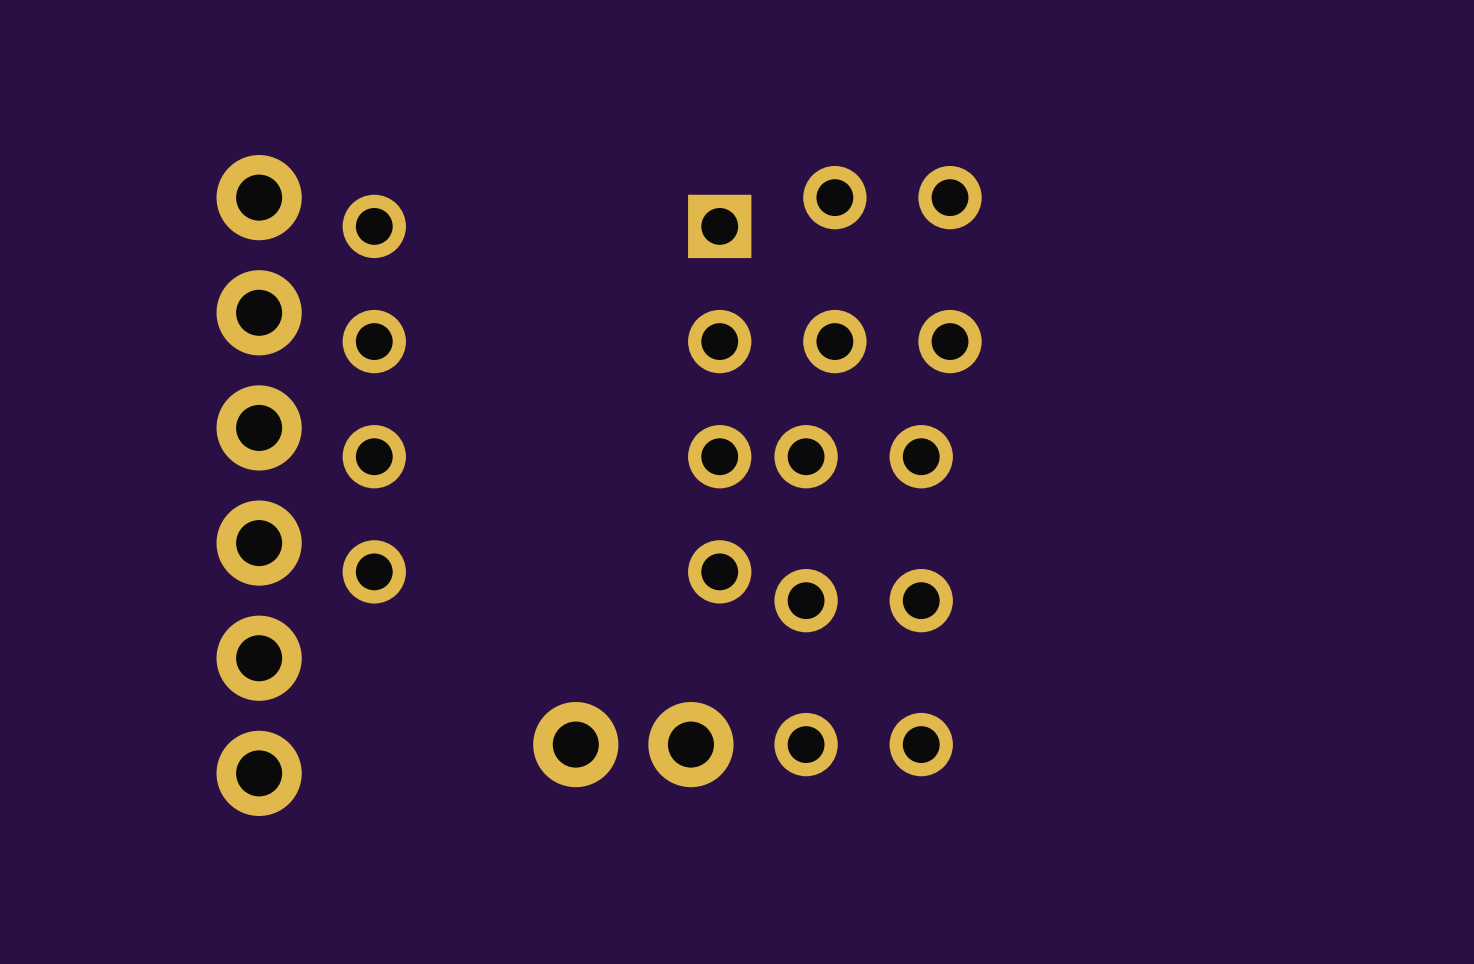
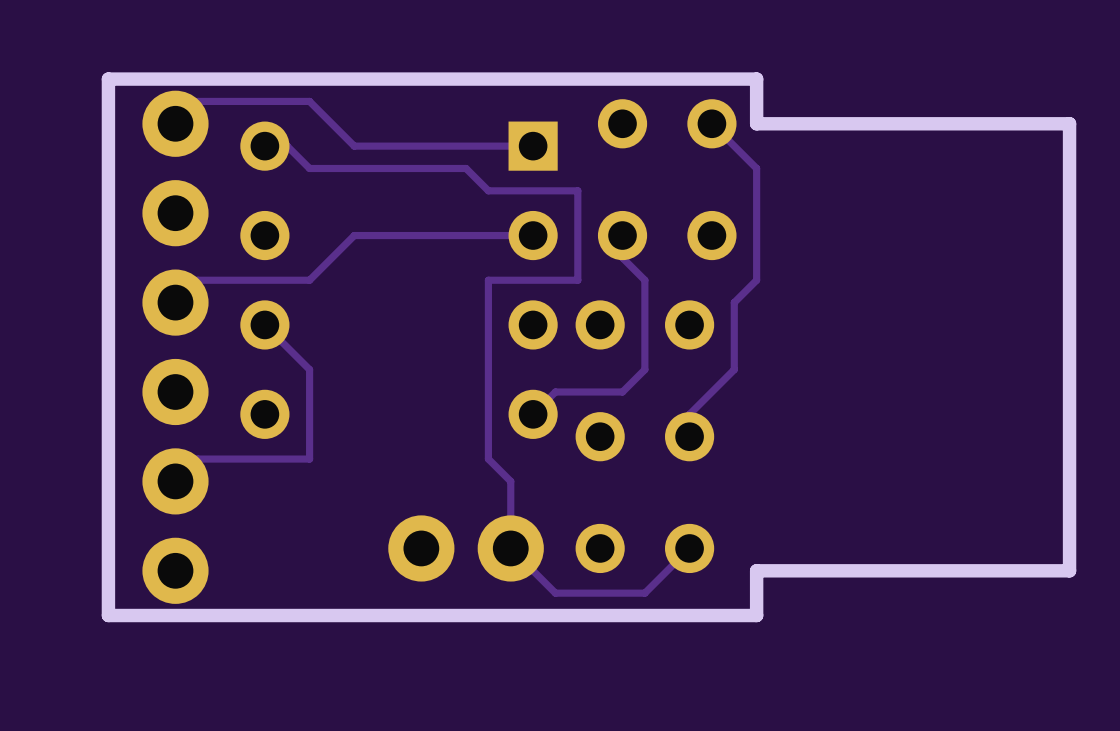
board edge: none -> (756, 79) (756, 123) (1069, 123) (1069, 570) (756, 570) (756, 615) (108, 615) (108, 79) (756, 79)
track: none -> (175, 123) (197, 101) (309, 101) (354, 146) (533, 146)
track: none -> (711, 123) (756, 168) (756, 280) (734, 302) (734, 369) (689, 414) (689, 436)
track: none -> (264, 146) (287, 146) (309, 168) (466, 168) (488, 190) (577, 190) (577, 280) (488, 280) (488, 459) (510, 481) (510, 548) (555, 593) (644, 593) (689, 548)
track: none -> (533, 235) (354, 235) (309, 280) (197, 280) (175, 302)
track: none -> (622, 235) (622, 257) (644, 280) (644, 369) (622, 392) (555, 392) (533, 414)
track: none -> (264, 324) (309, 369) (309, 459) (197, 459) (175, 481)

